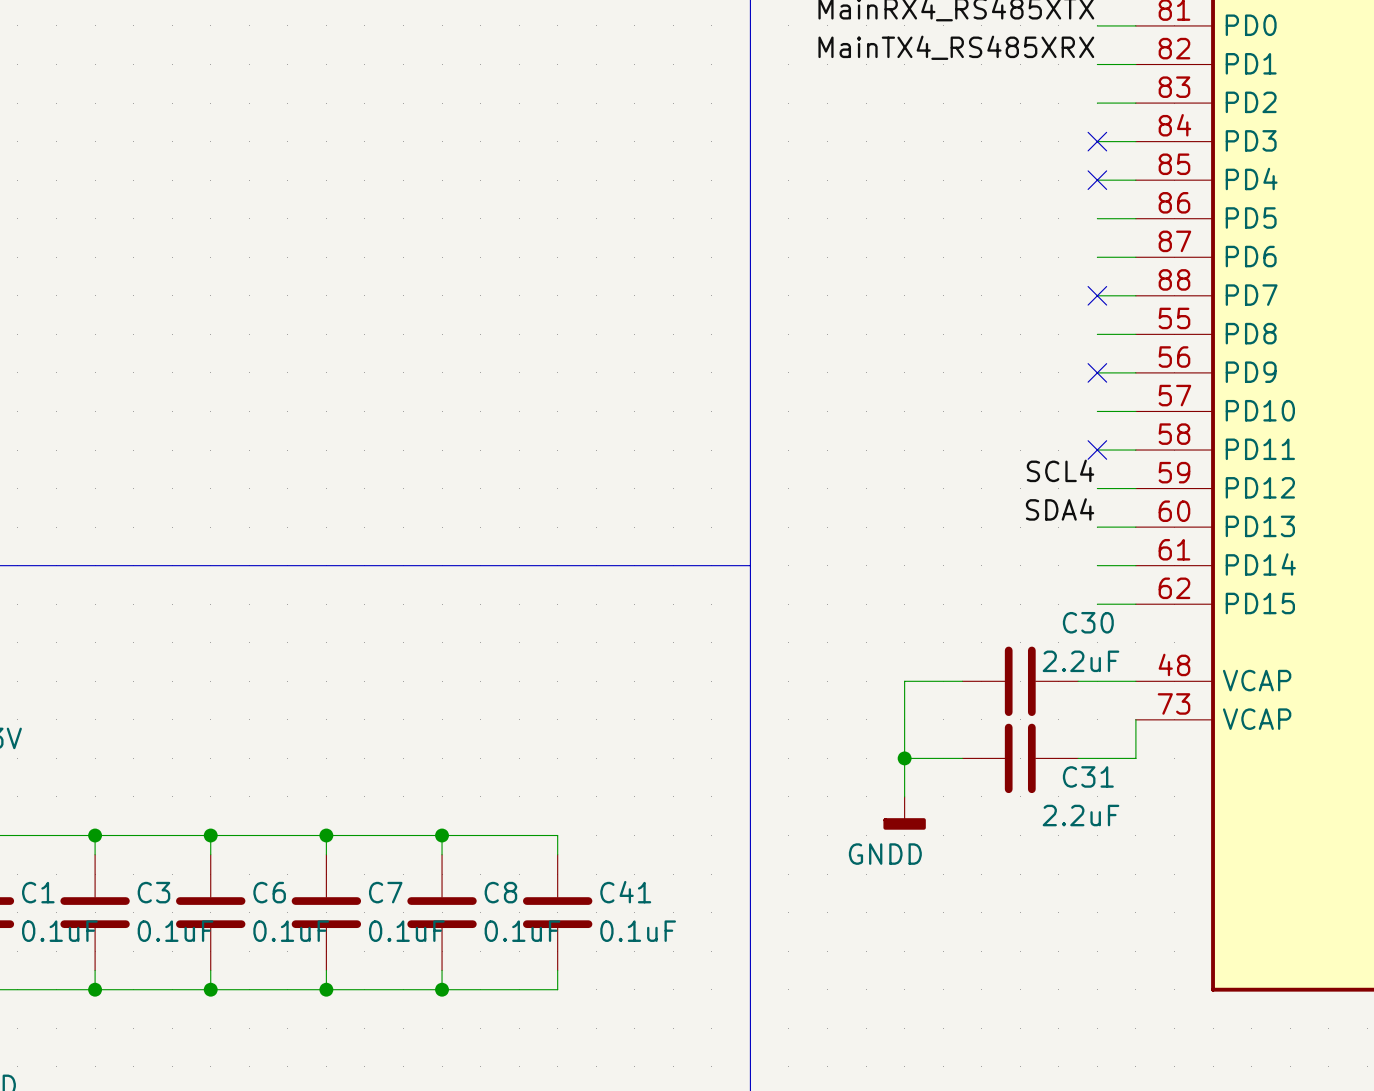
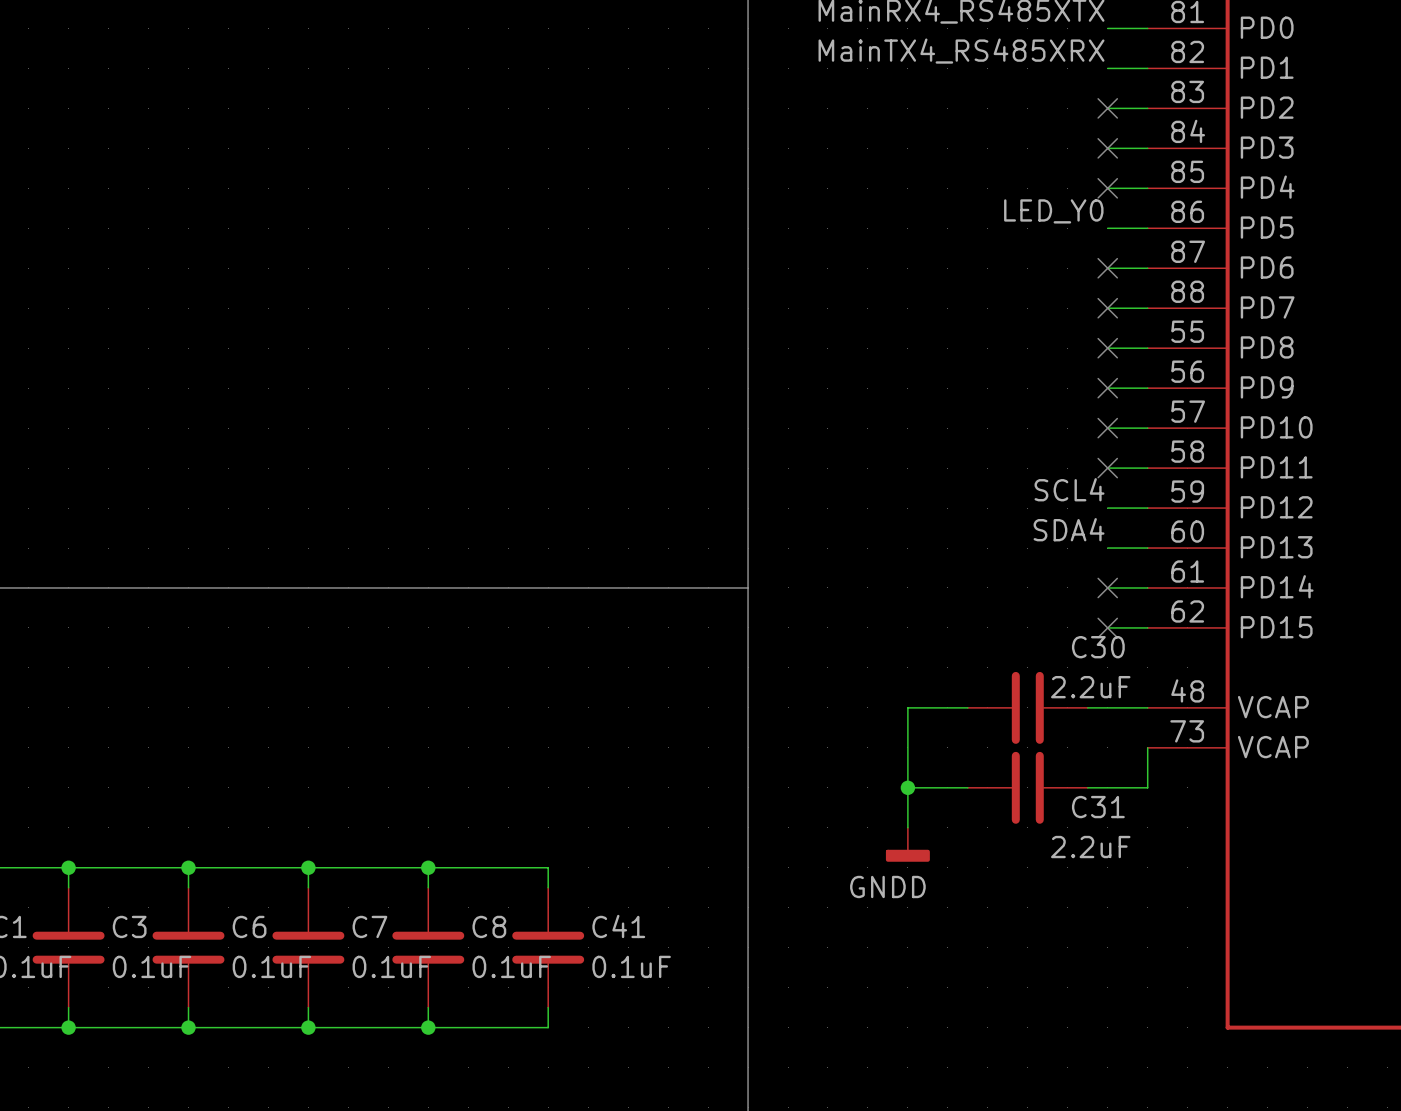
no-connect mark: none -> (1107, 108)
label: none -> LED_Y0 (1053, 211)
no-connect mark: none -> (1107, 268)
no-connect mark: none -> (1107, 348)
no-connect mark: none -> (1107, 428)
no-connect mark: none -> (1107, 587)
no-connect mark: none -> (1107, 627)

